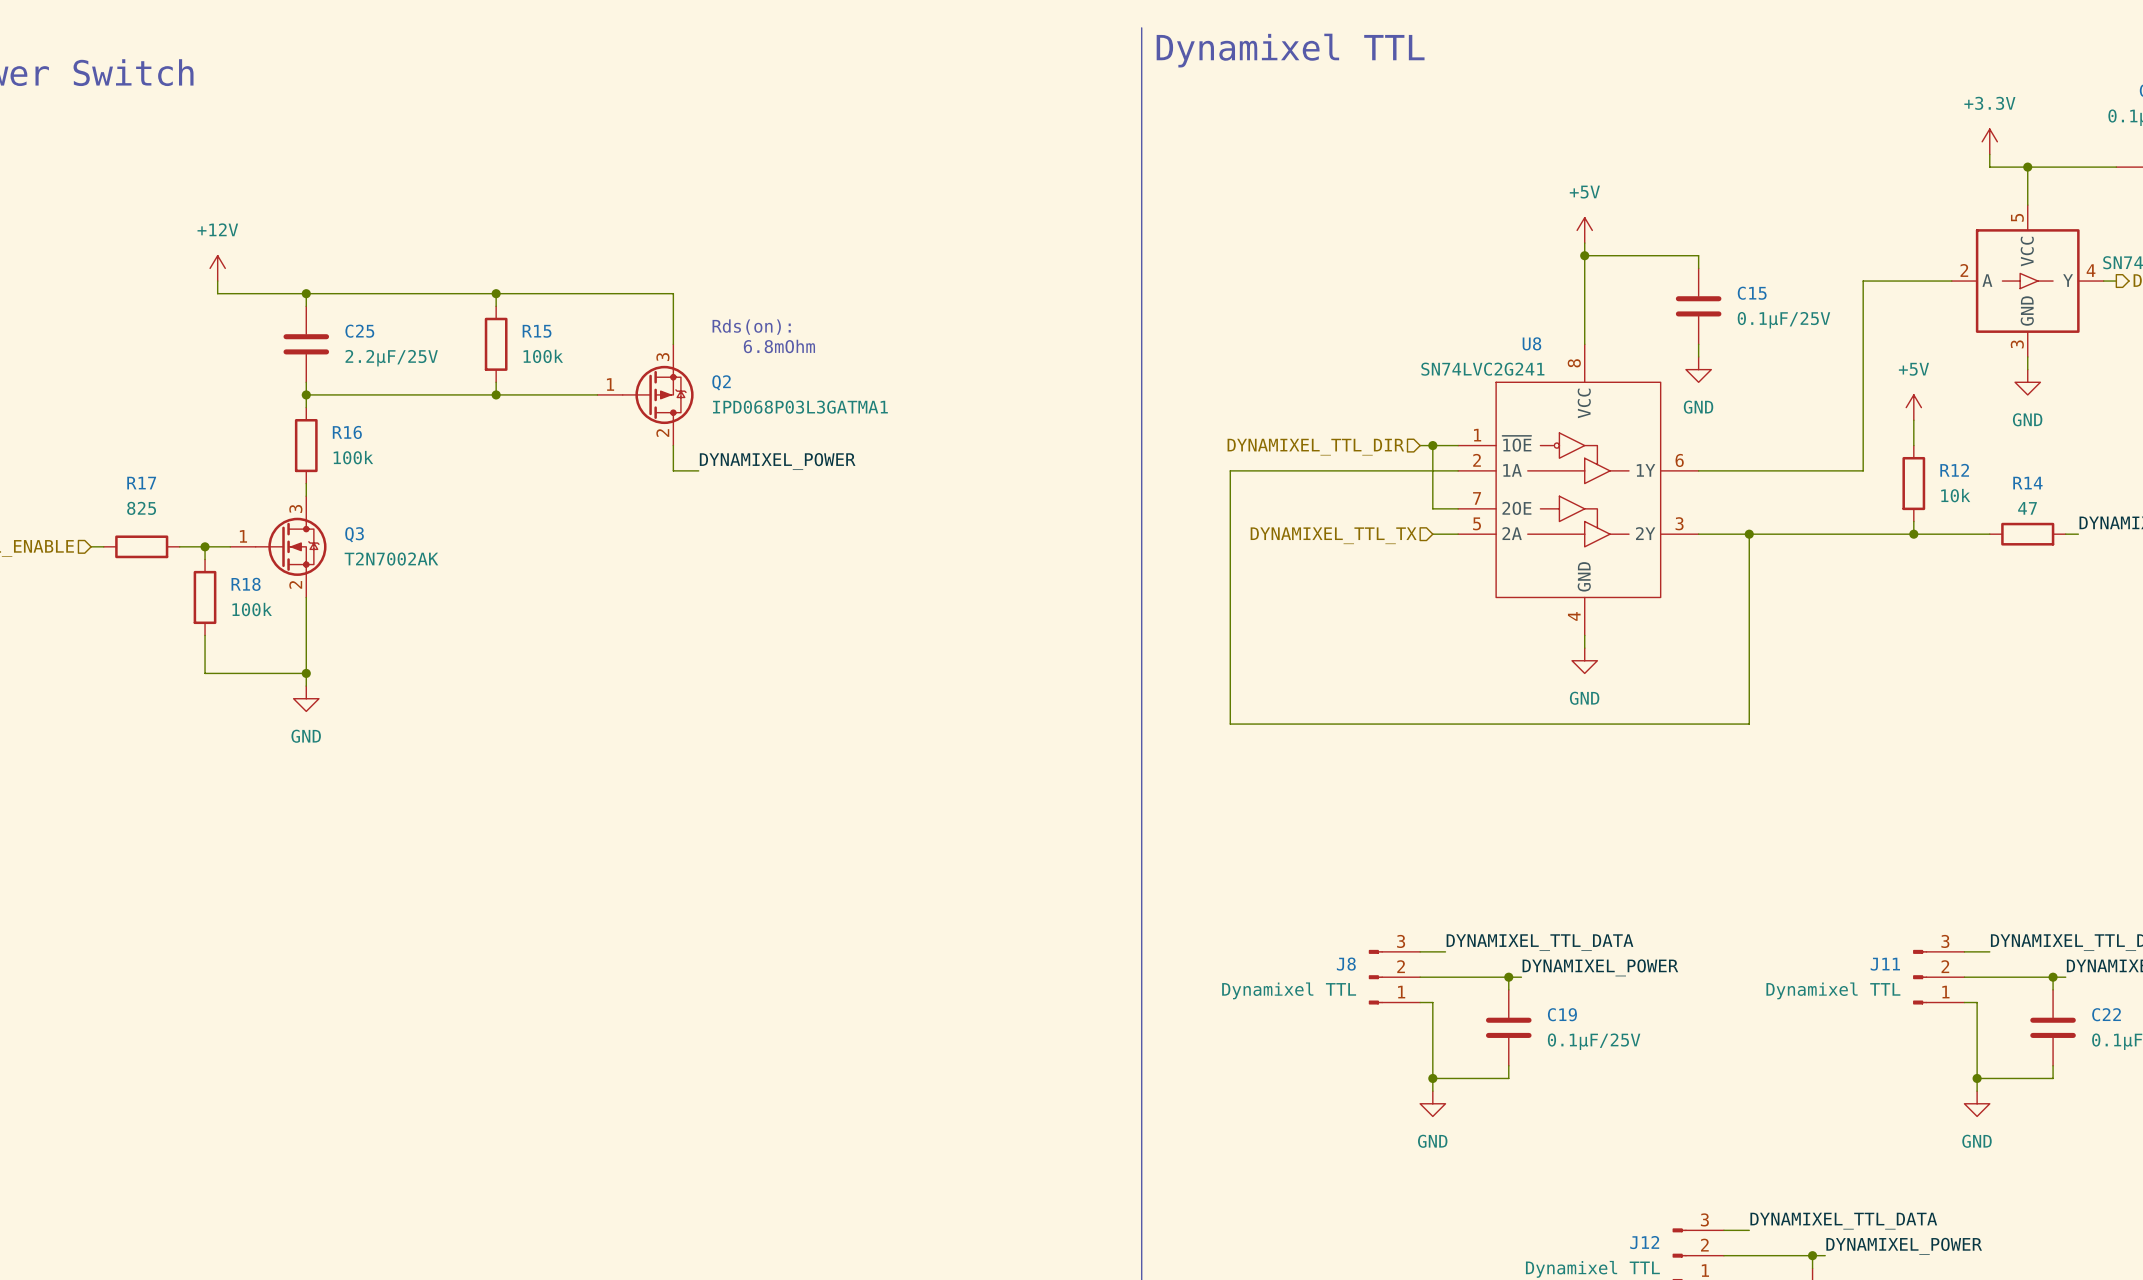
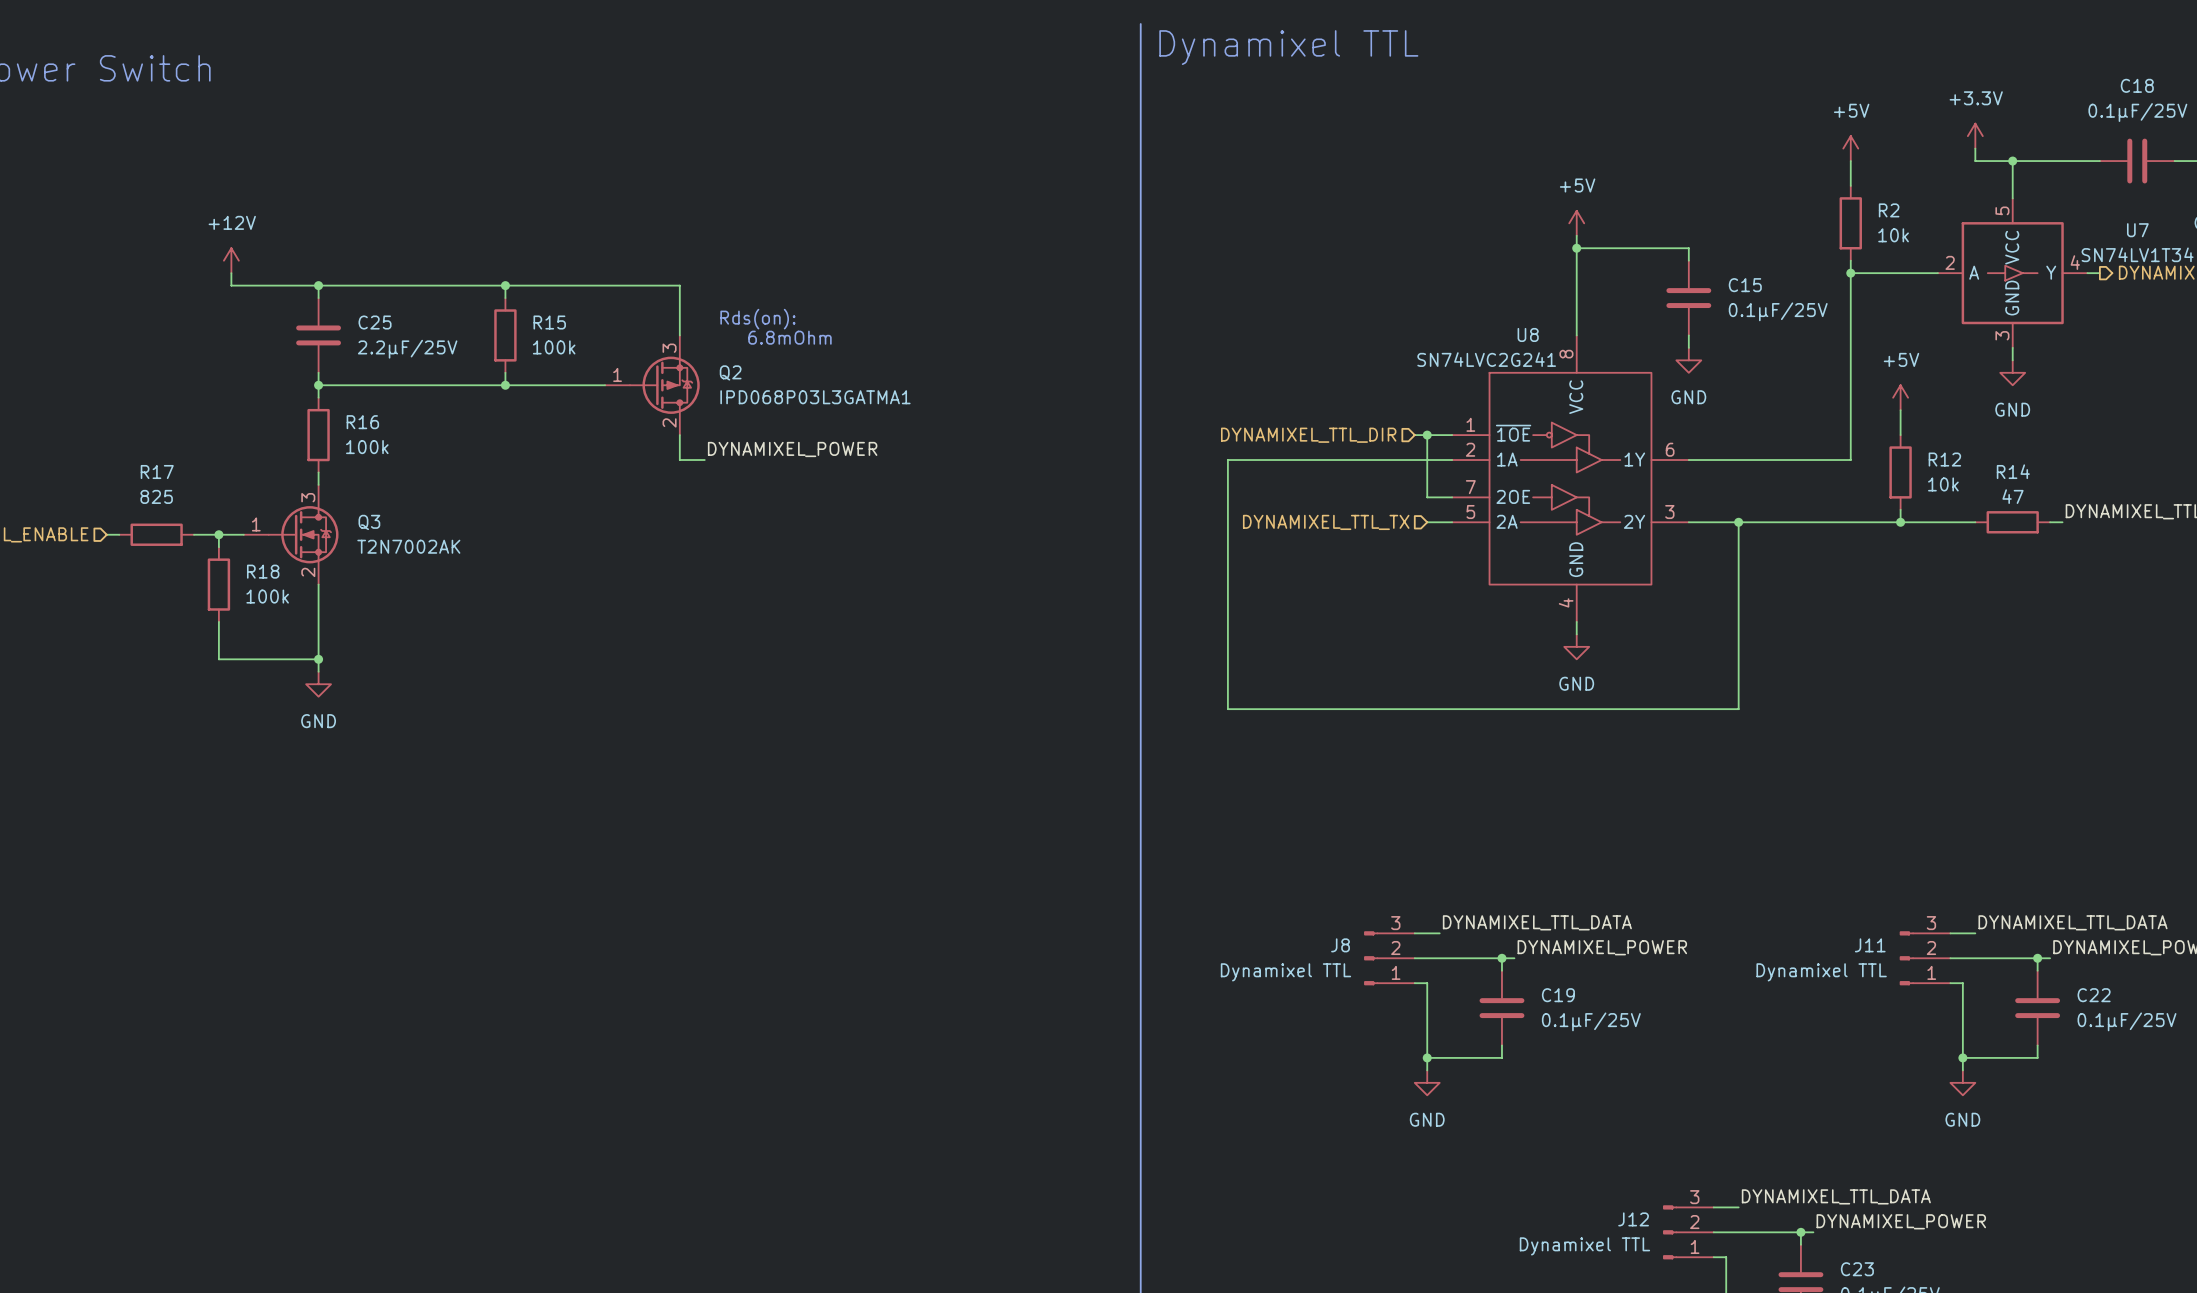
power symbol: none -> +5V (1850, 148)
wire: none -> (1850, 161) (1850, 185)
R2: none -> 10k (1850, 223)
wire: none -> (1850, 260) (1850, 273)
junction: none -> (1850, 273)

